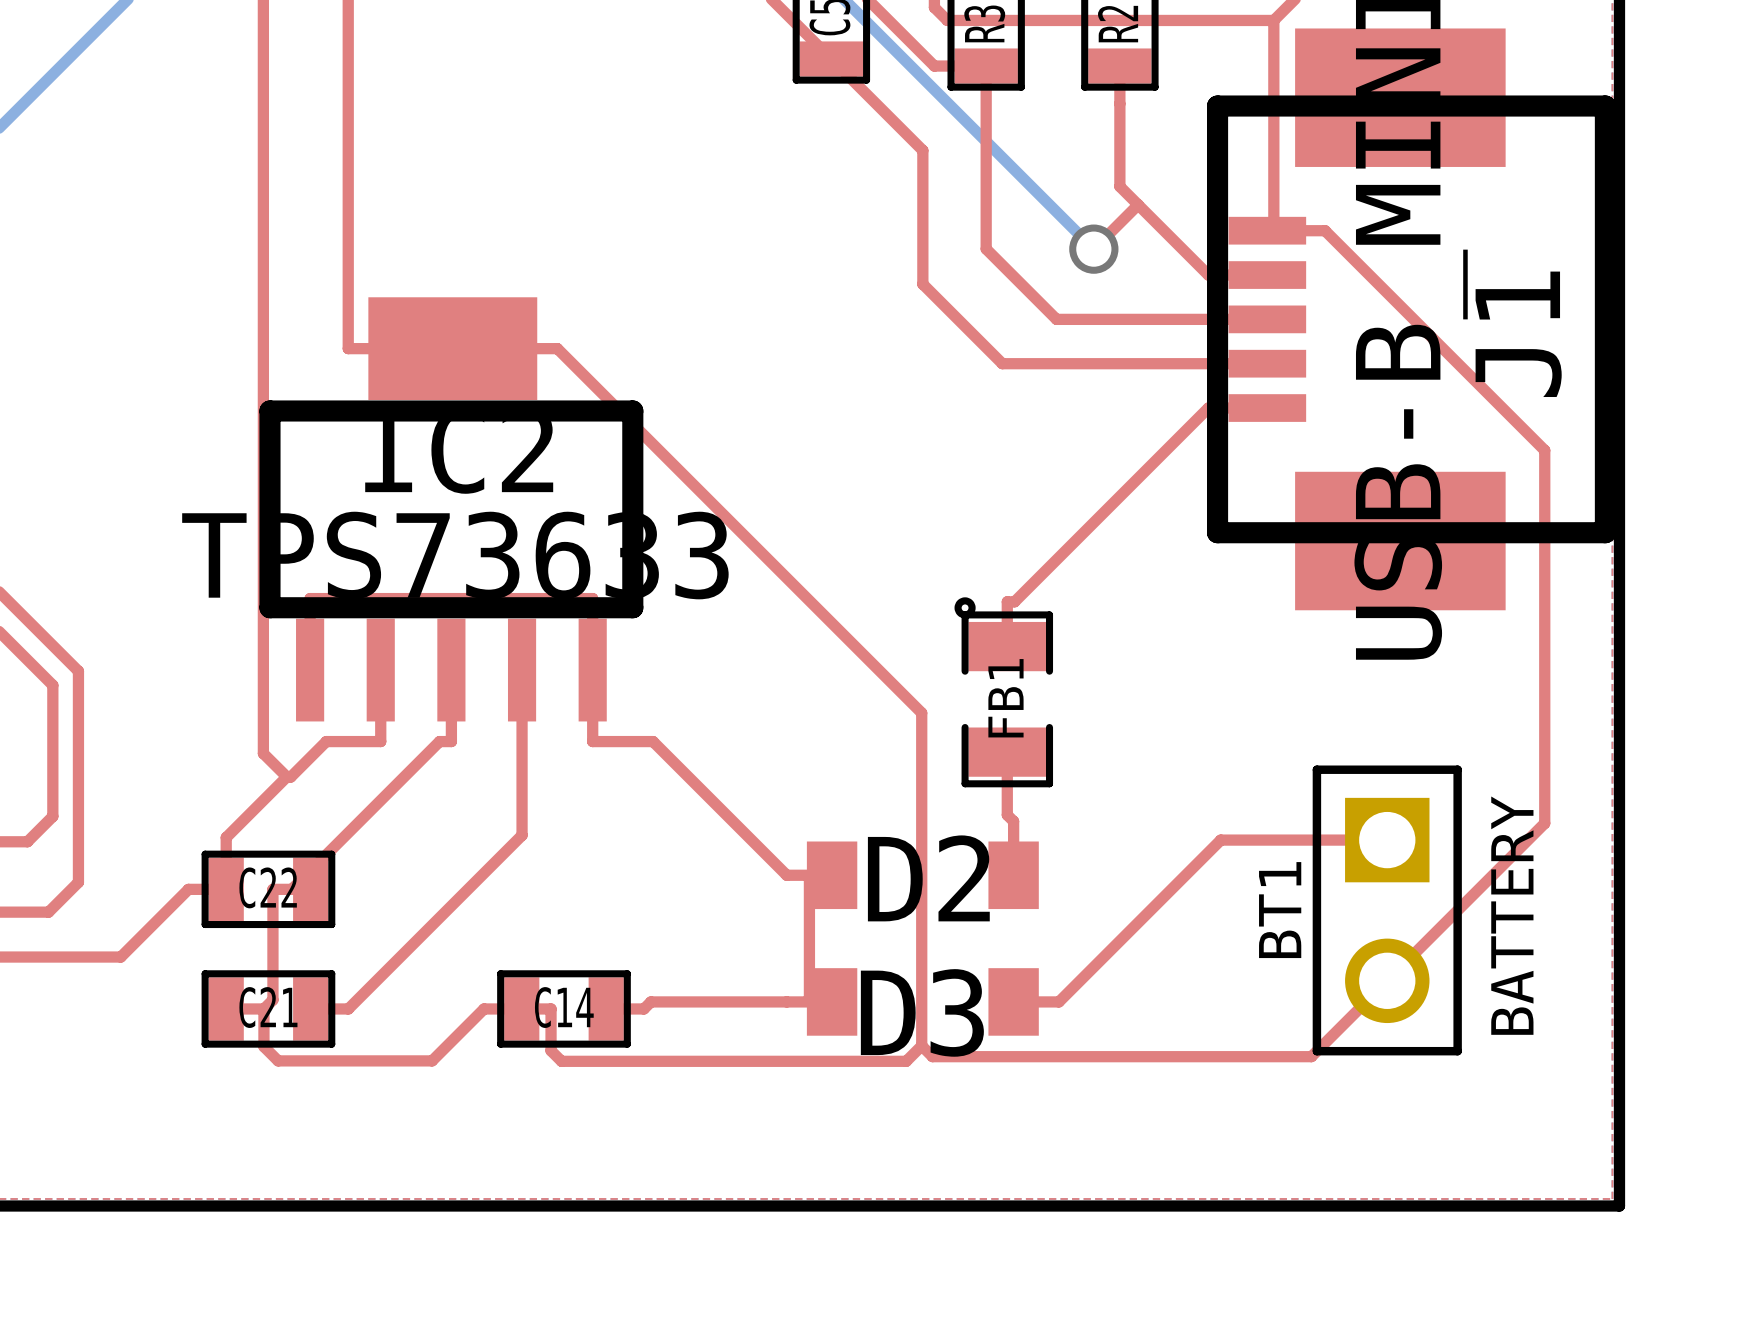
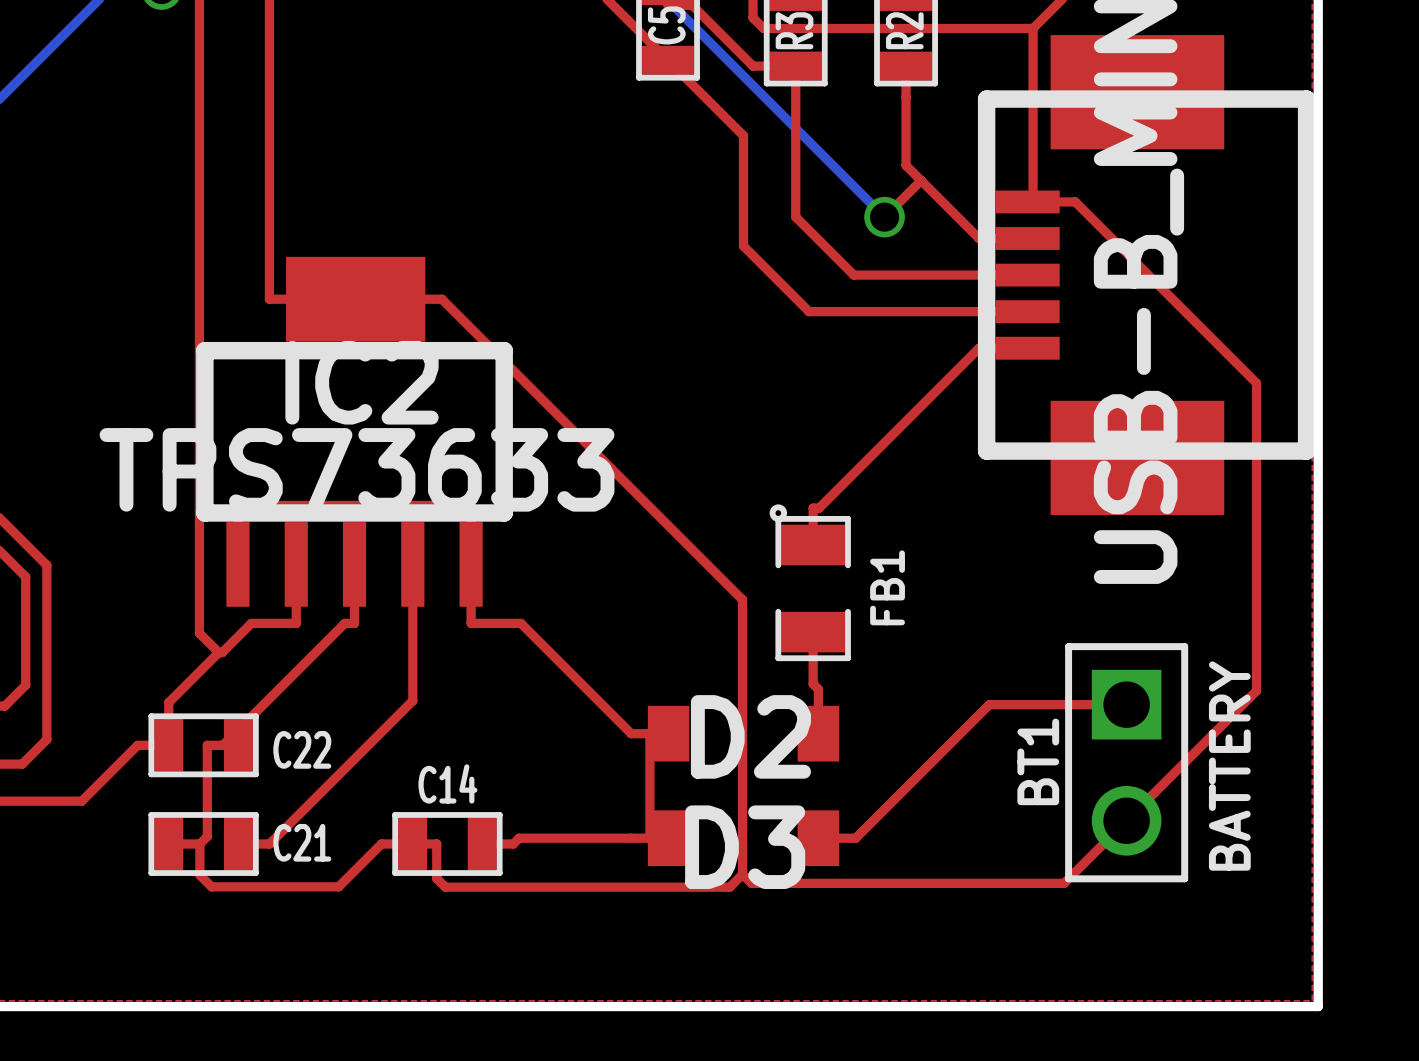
J1 name: J1 (1518, 334) -> none
FB1 name position: FB1 (1005, 698) -> FB1 (887, 587)
C22 name position: C22 (268, 887) -> C22 (302, 749)
C21 name position: C21 (268, 1007) -> C21 (302, 842)
C14 name position: C14 (564, 1007) -> C14 (447, 783)

